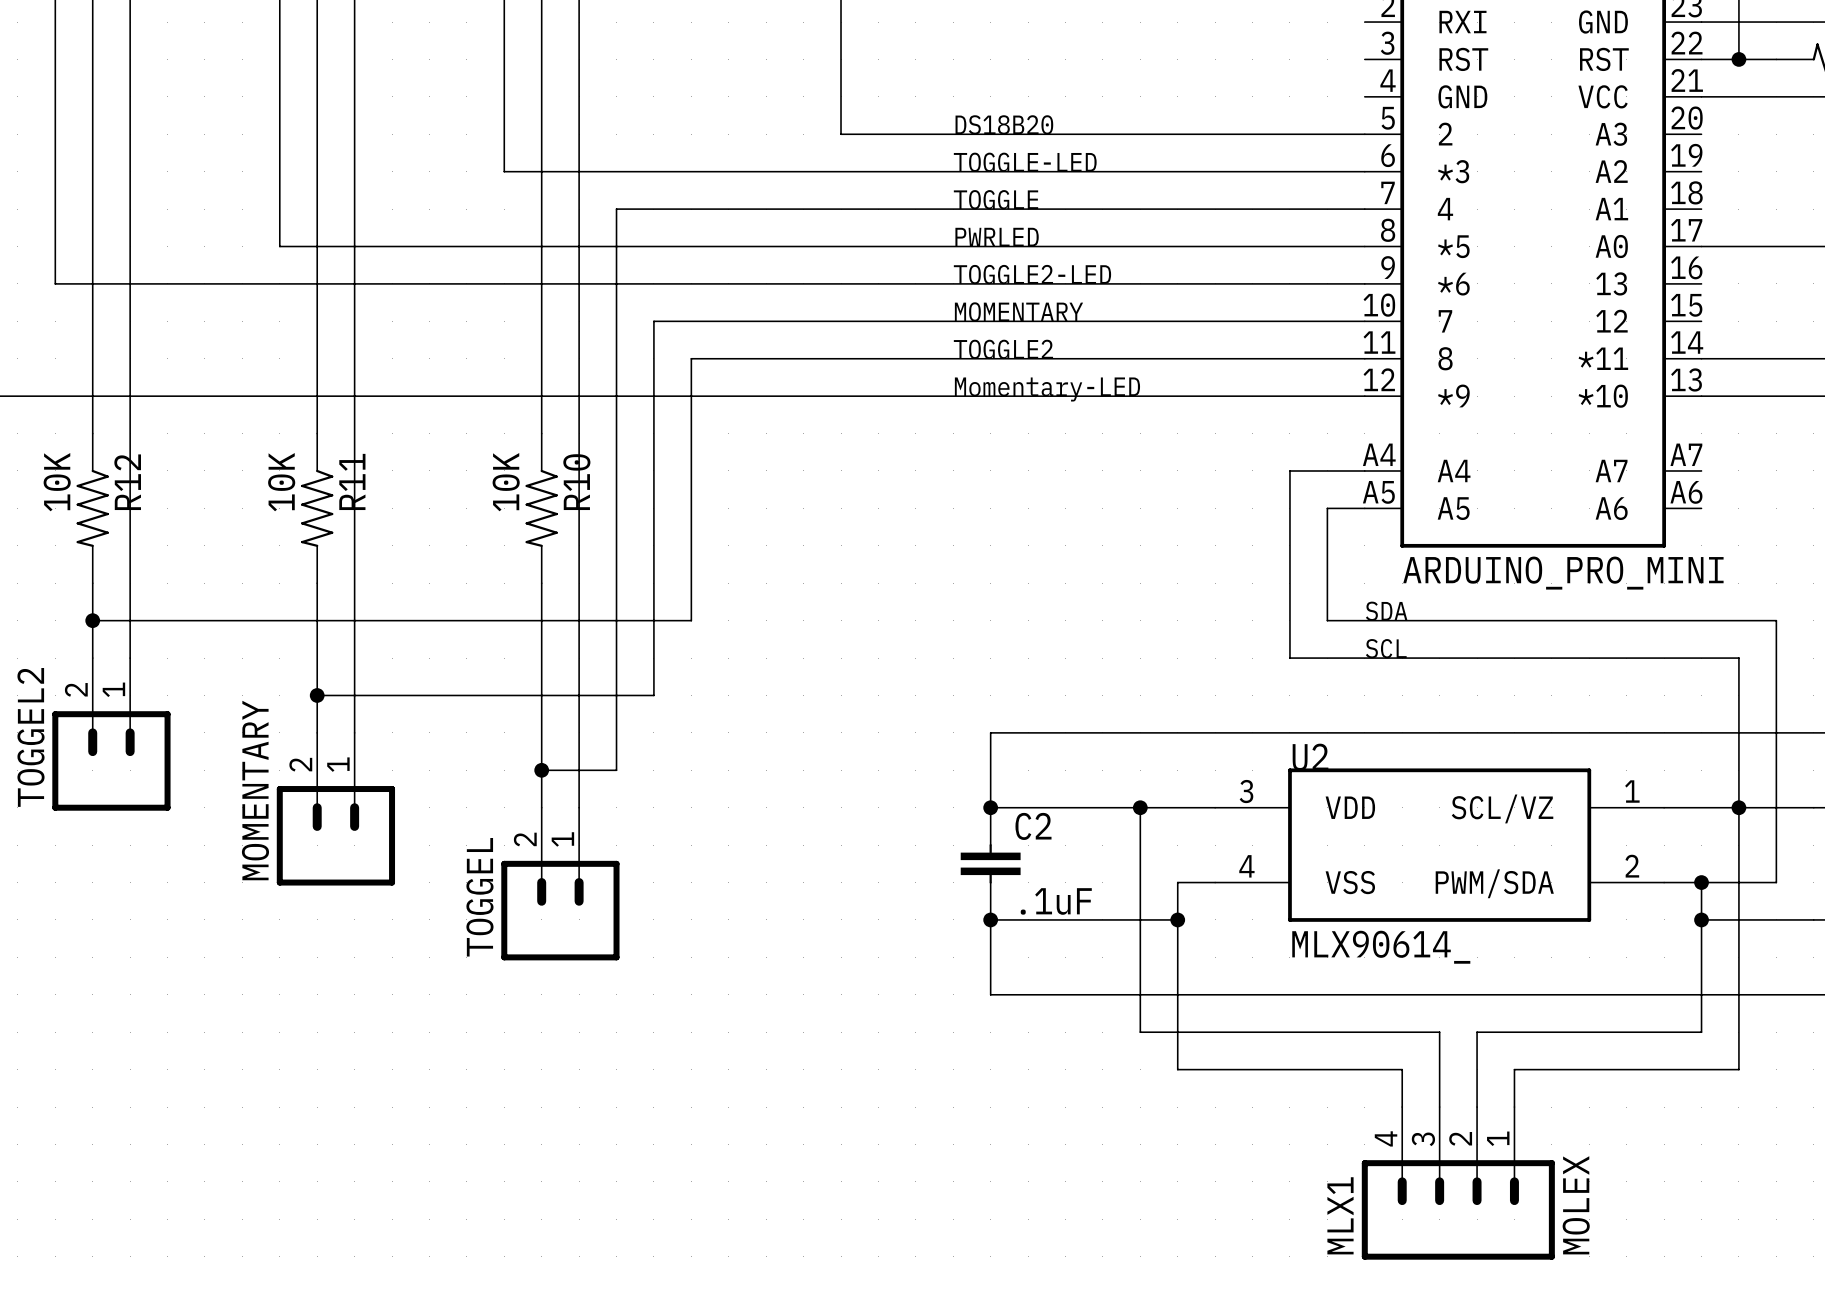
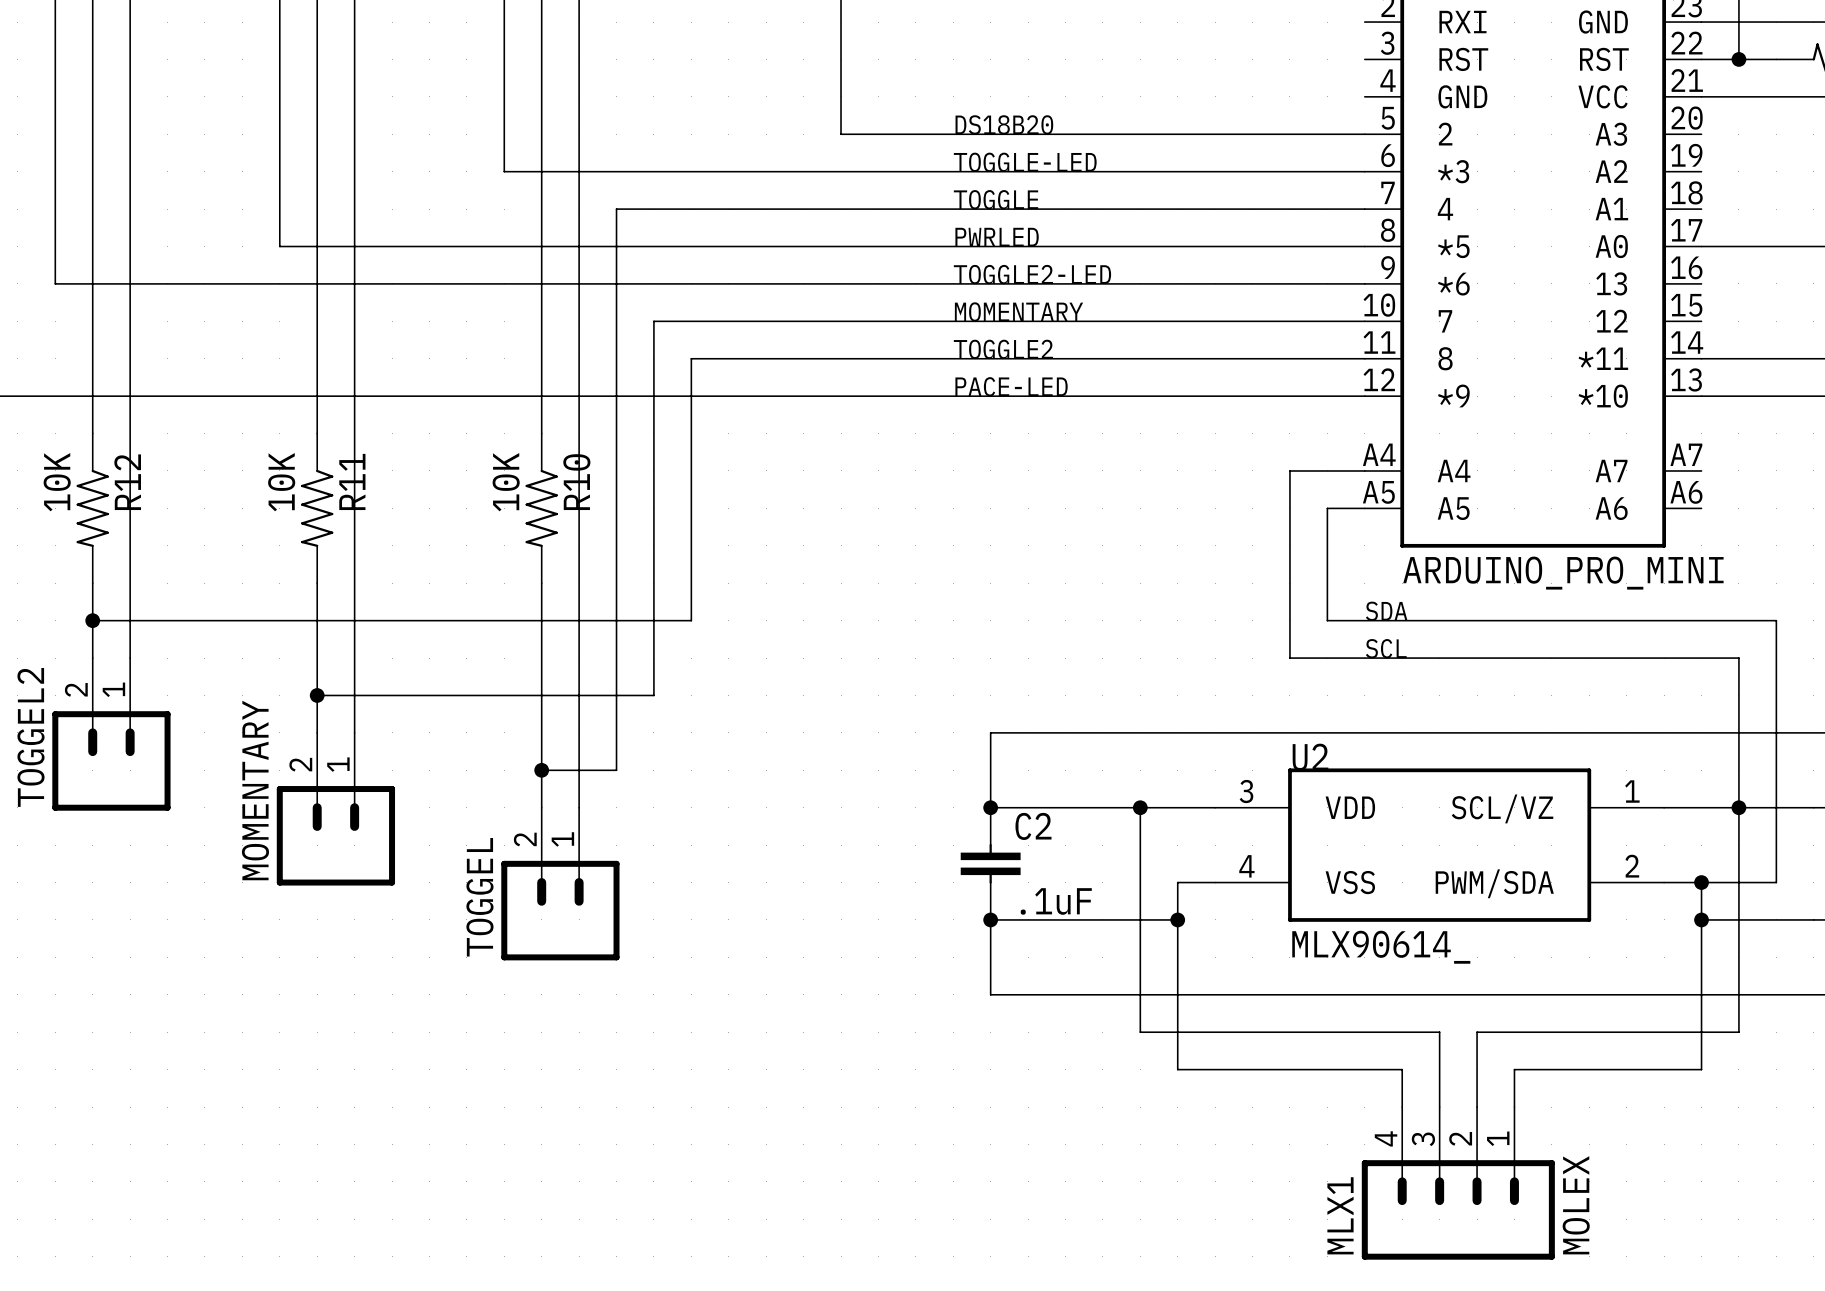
text: Momentary-LED (1047, 389) -> PACE-LED (1011, 386)
wire: (1738, 1032) (1738, 1069) (1701, 1069) -> (1738, 1032) (1701, 1032) (1701, 1069)

